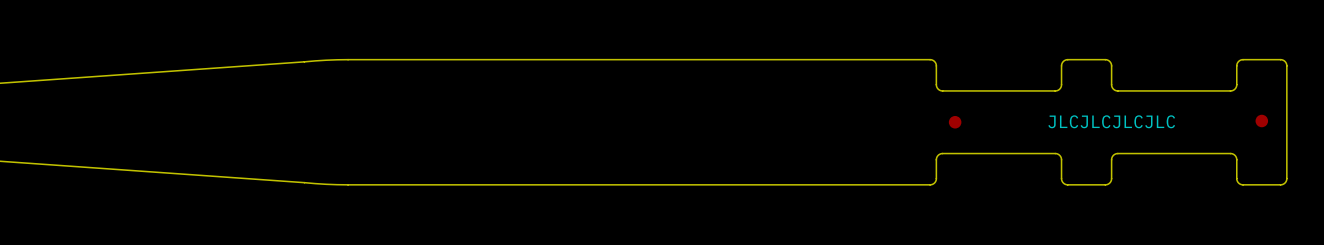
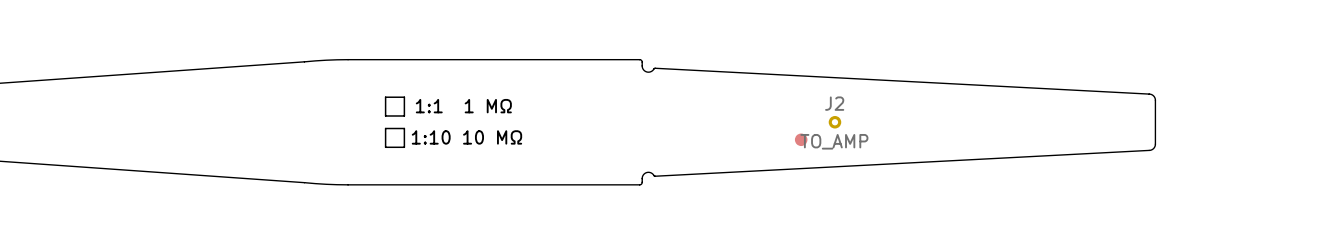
board edge: (639, 59) (930, 59) (936, 64) (936, 87) (942, 90) (1056, 90) (1061, 85) (1061, 64) (1066, 59) (1108, 60) (1111, 65) (1111, 86) (1117, 90) (1231, 90) (1236, 86) (1236, 65) (1240, 60) (1281, 59) (1285, 61) (1286, 65) (1286, 178) (1285, 183) (1281, 184) (1239, 184) (1236, 179) (1236, 158) (1231, 153) (1117, 153) (1111, 158) (1111, 179) (1108, 184) (1067, 184) (1062, 180) (1061, 158) (1056, 153) (942, 153) (936, 157) (936, 180) (930, 184) (639, 184) -> (639, 59) (642, 61) (643, 69) (647, 72) (655, 68) (1149, 94) (1153, 95) (1155, 100) (1155, 144) (1149, 150) (655, 176) (648, 172) (643, 175) (642, 183) (639, 184)
line: none -> (385, 97) (385, 115) (404, 115) (404, 97) (385, 97)
text: none -> 1:1 1 MΩ (463, 106)
text: JLCJLCJLCJLC (1111, 121) -> none
part: (1261, 121) -> none
J2: none -> TO_AMP (834, 122)
part position: (955, 122) -> (801, 139)
line: none -> (385, 128) (404, 128) (404, 147) (385, 147) (385, 128)
text: none -> 1:10 10 MΩ (466, 137)

